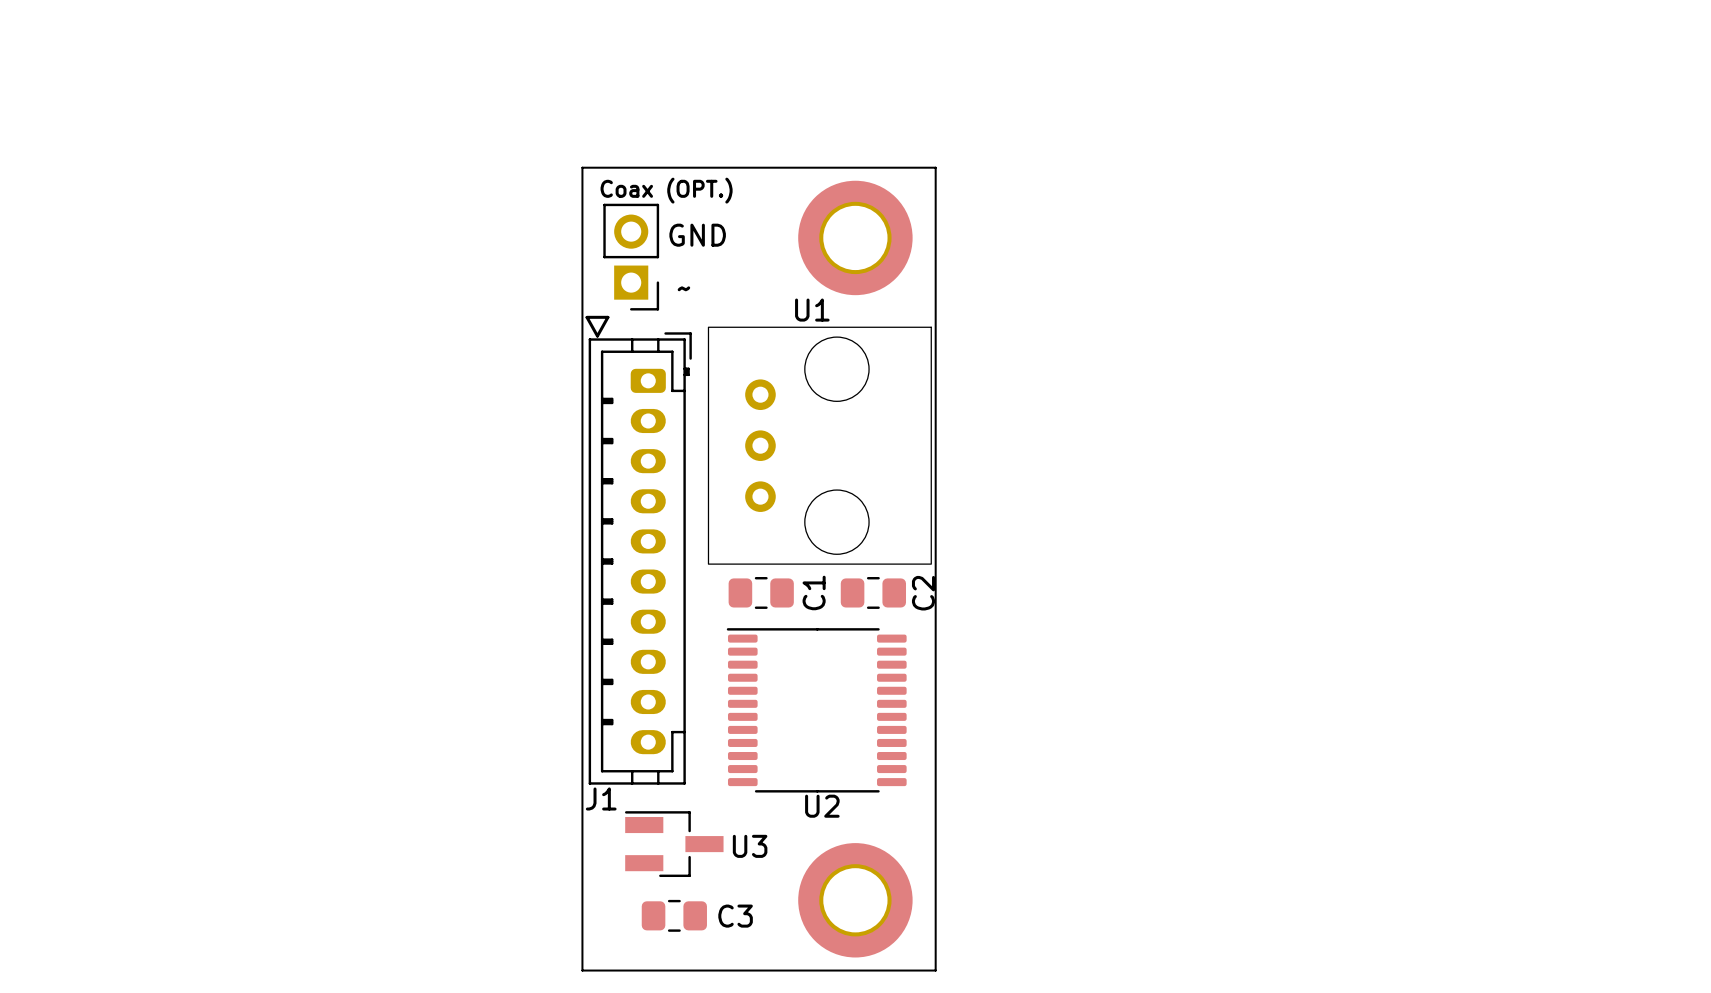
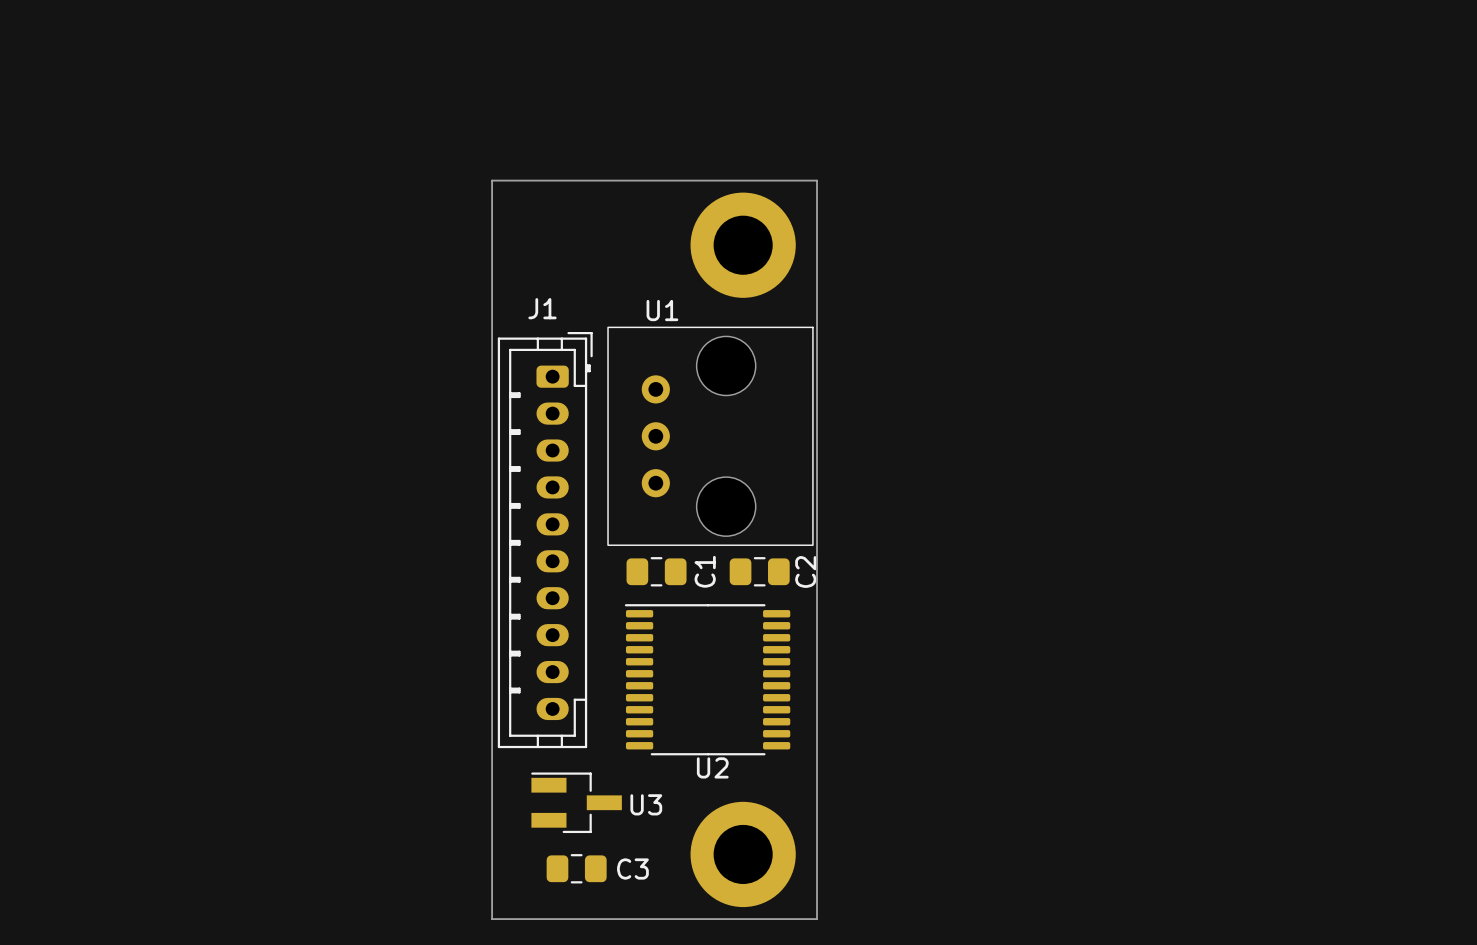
text: Coax (OPT.) (666, 190) -> none
text: GND (697, 235) -> none
part: (631, 257) -> none
text: ~ (683, 288) -> none
U1 name position: U1 (812, 310) -> U1 (662, 310)
line: (587, 317) (607, 317) (597, 336) (587, 317) -> none
J1 name position: J1 (601, 798) -> J1 (542, 308)

